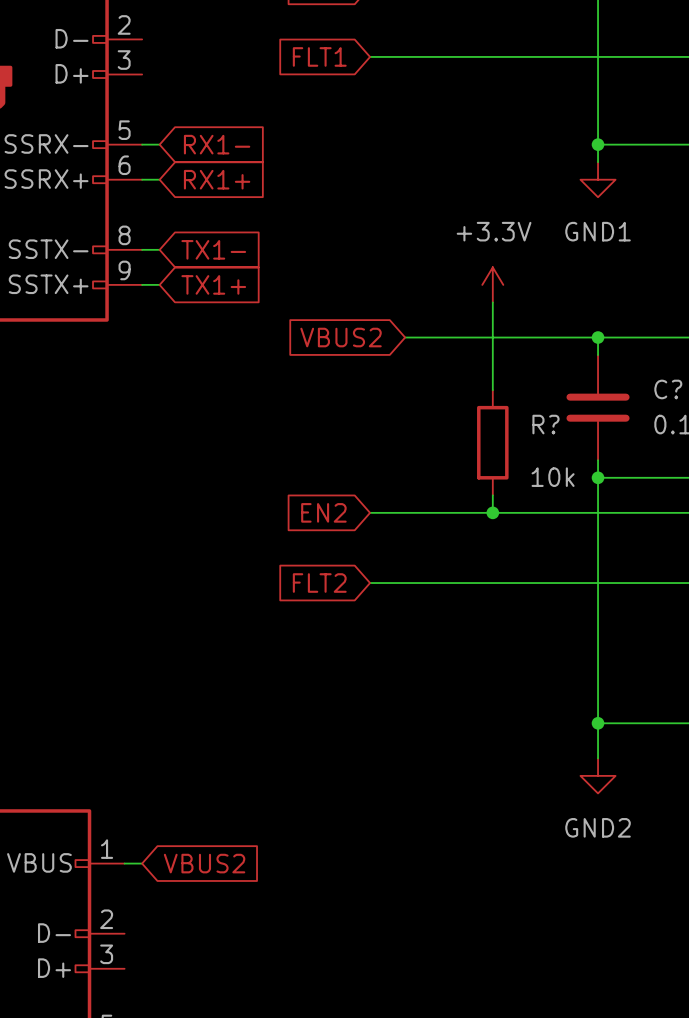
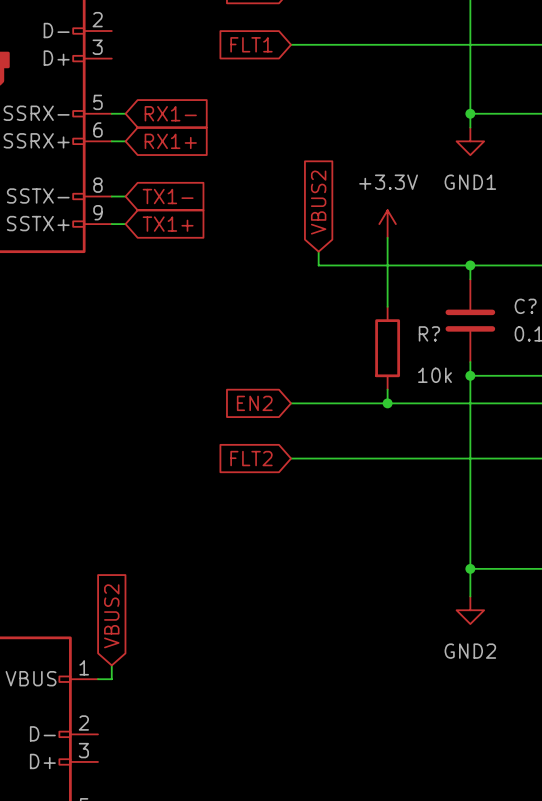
wire: none -> (318, 251) (318, 265)
global label rotation: 0° (341, 337) -> 90° clockwise (318, 202)
wire: none -> (111, 665) (111, 679)
global label rotation: 0° (204, 863) -> 90° counterclockwise (111, 616)

